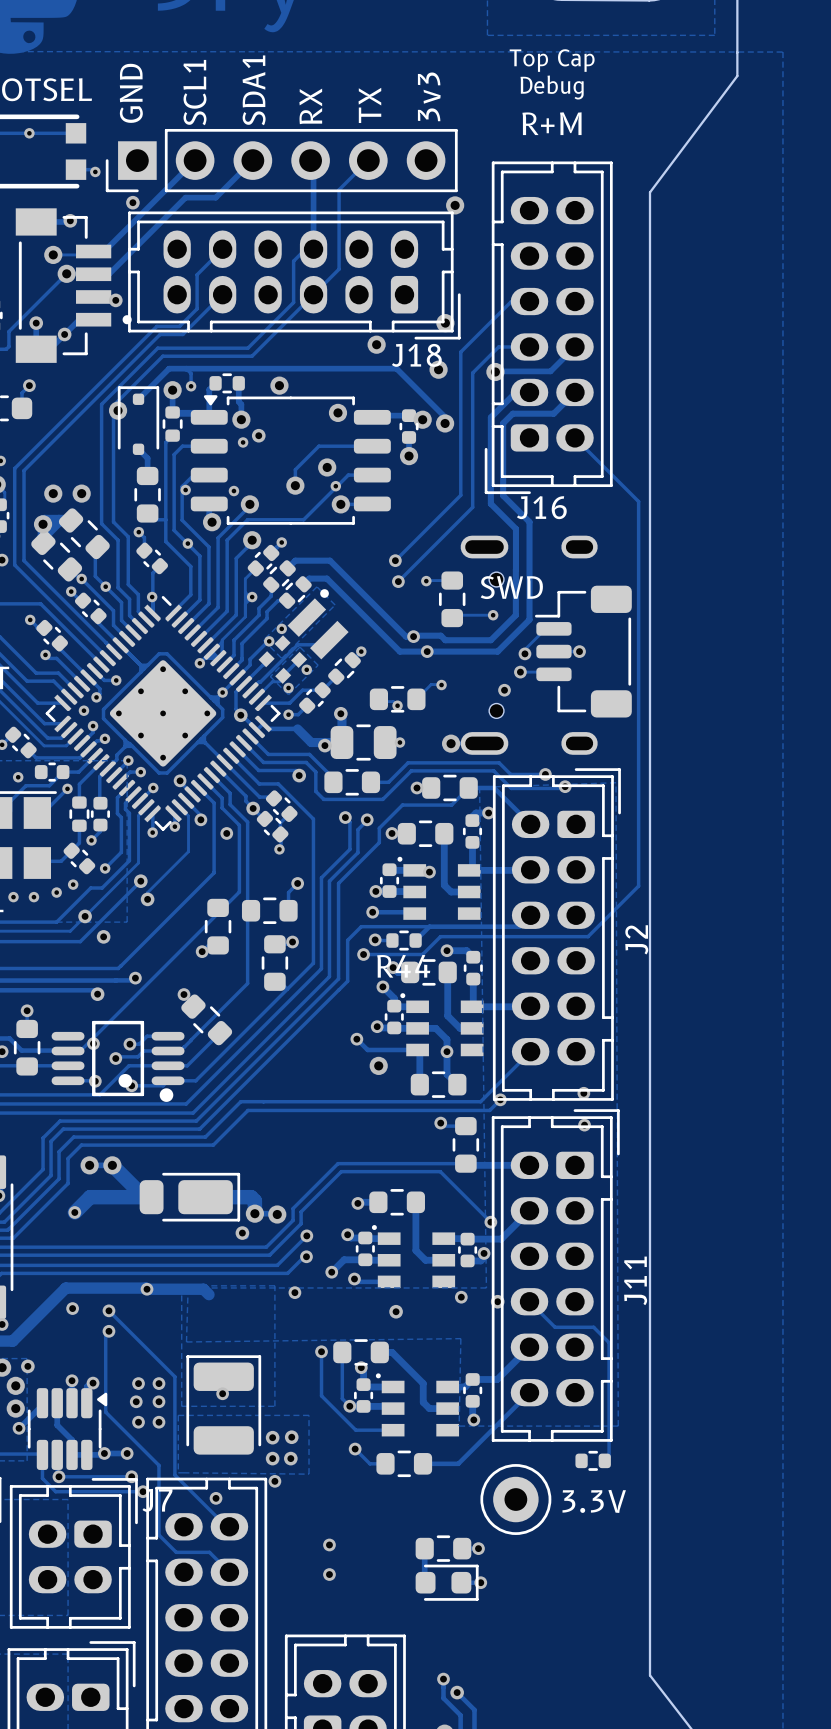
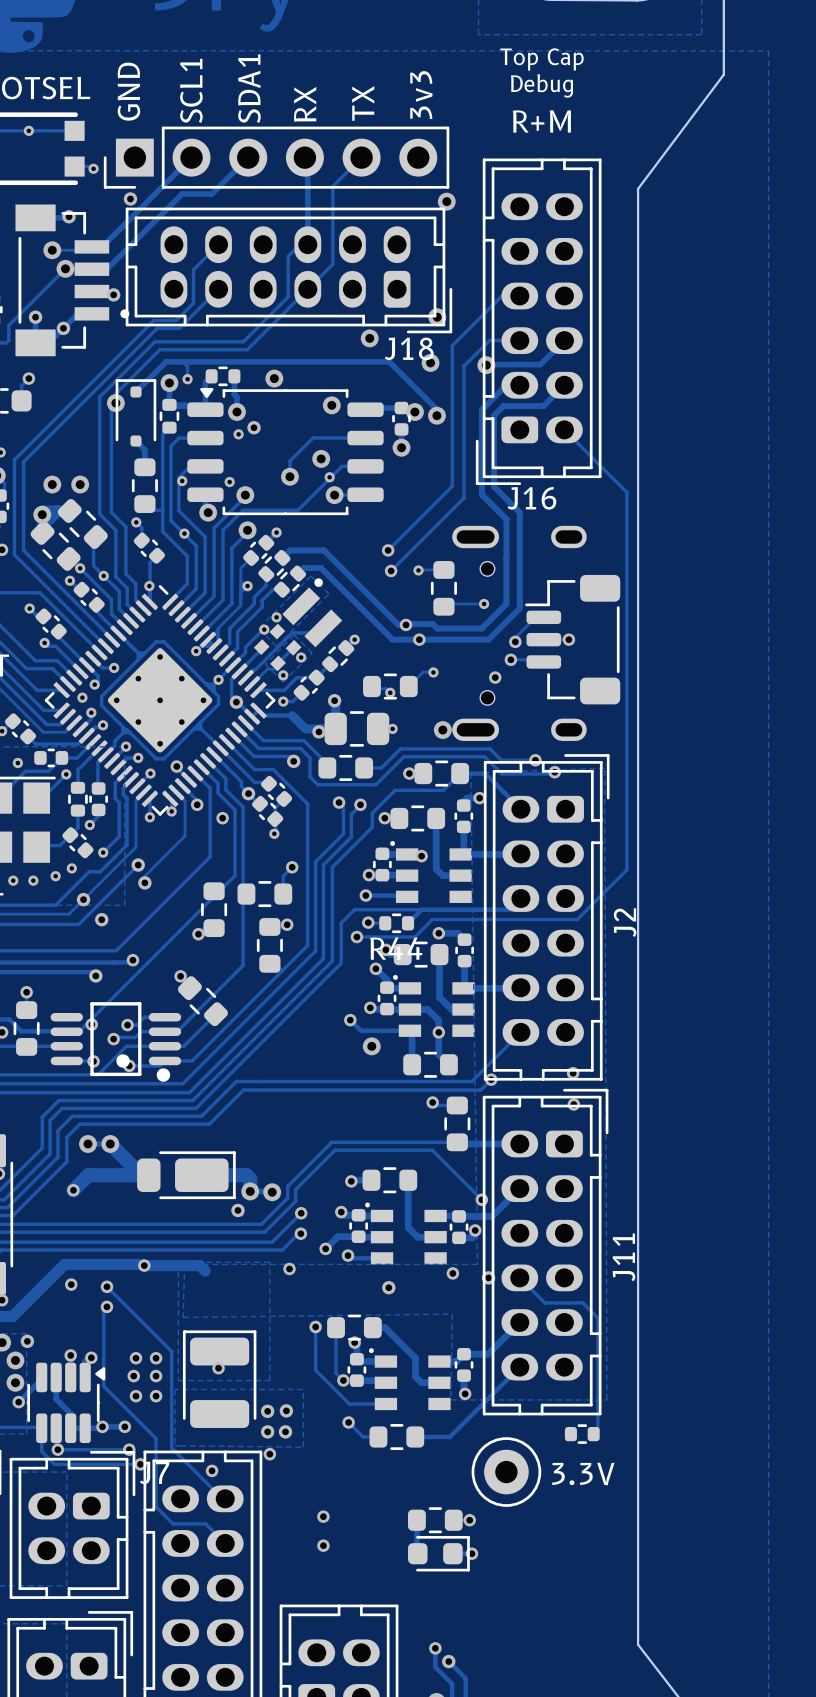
text: SWD (511, 587) -> none

